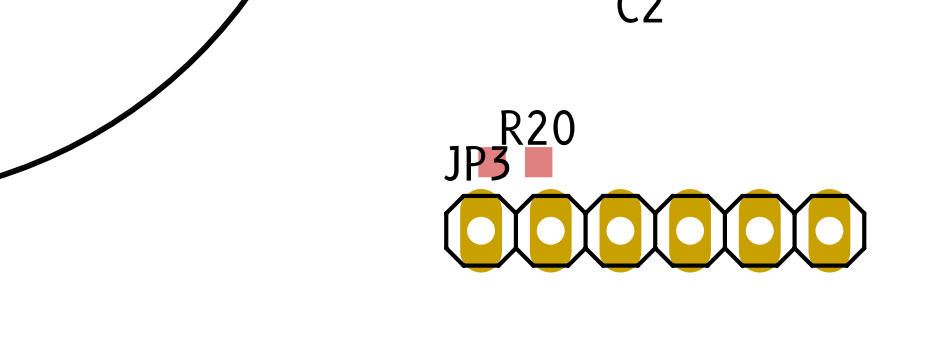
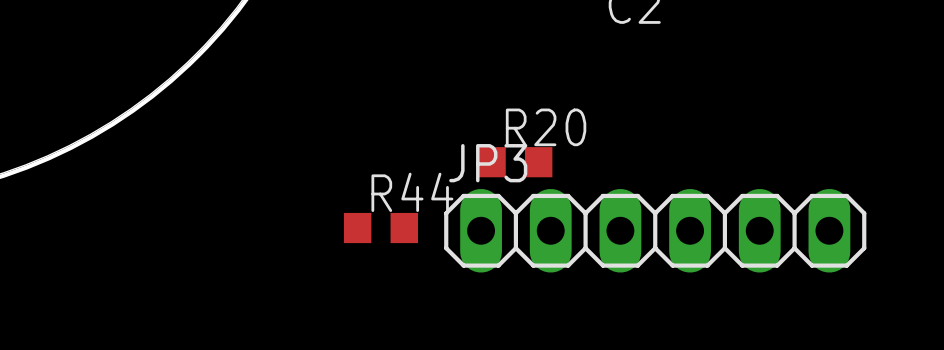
R44: none -> (380, 228)

